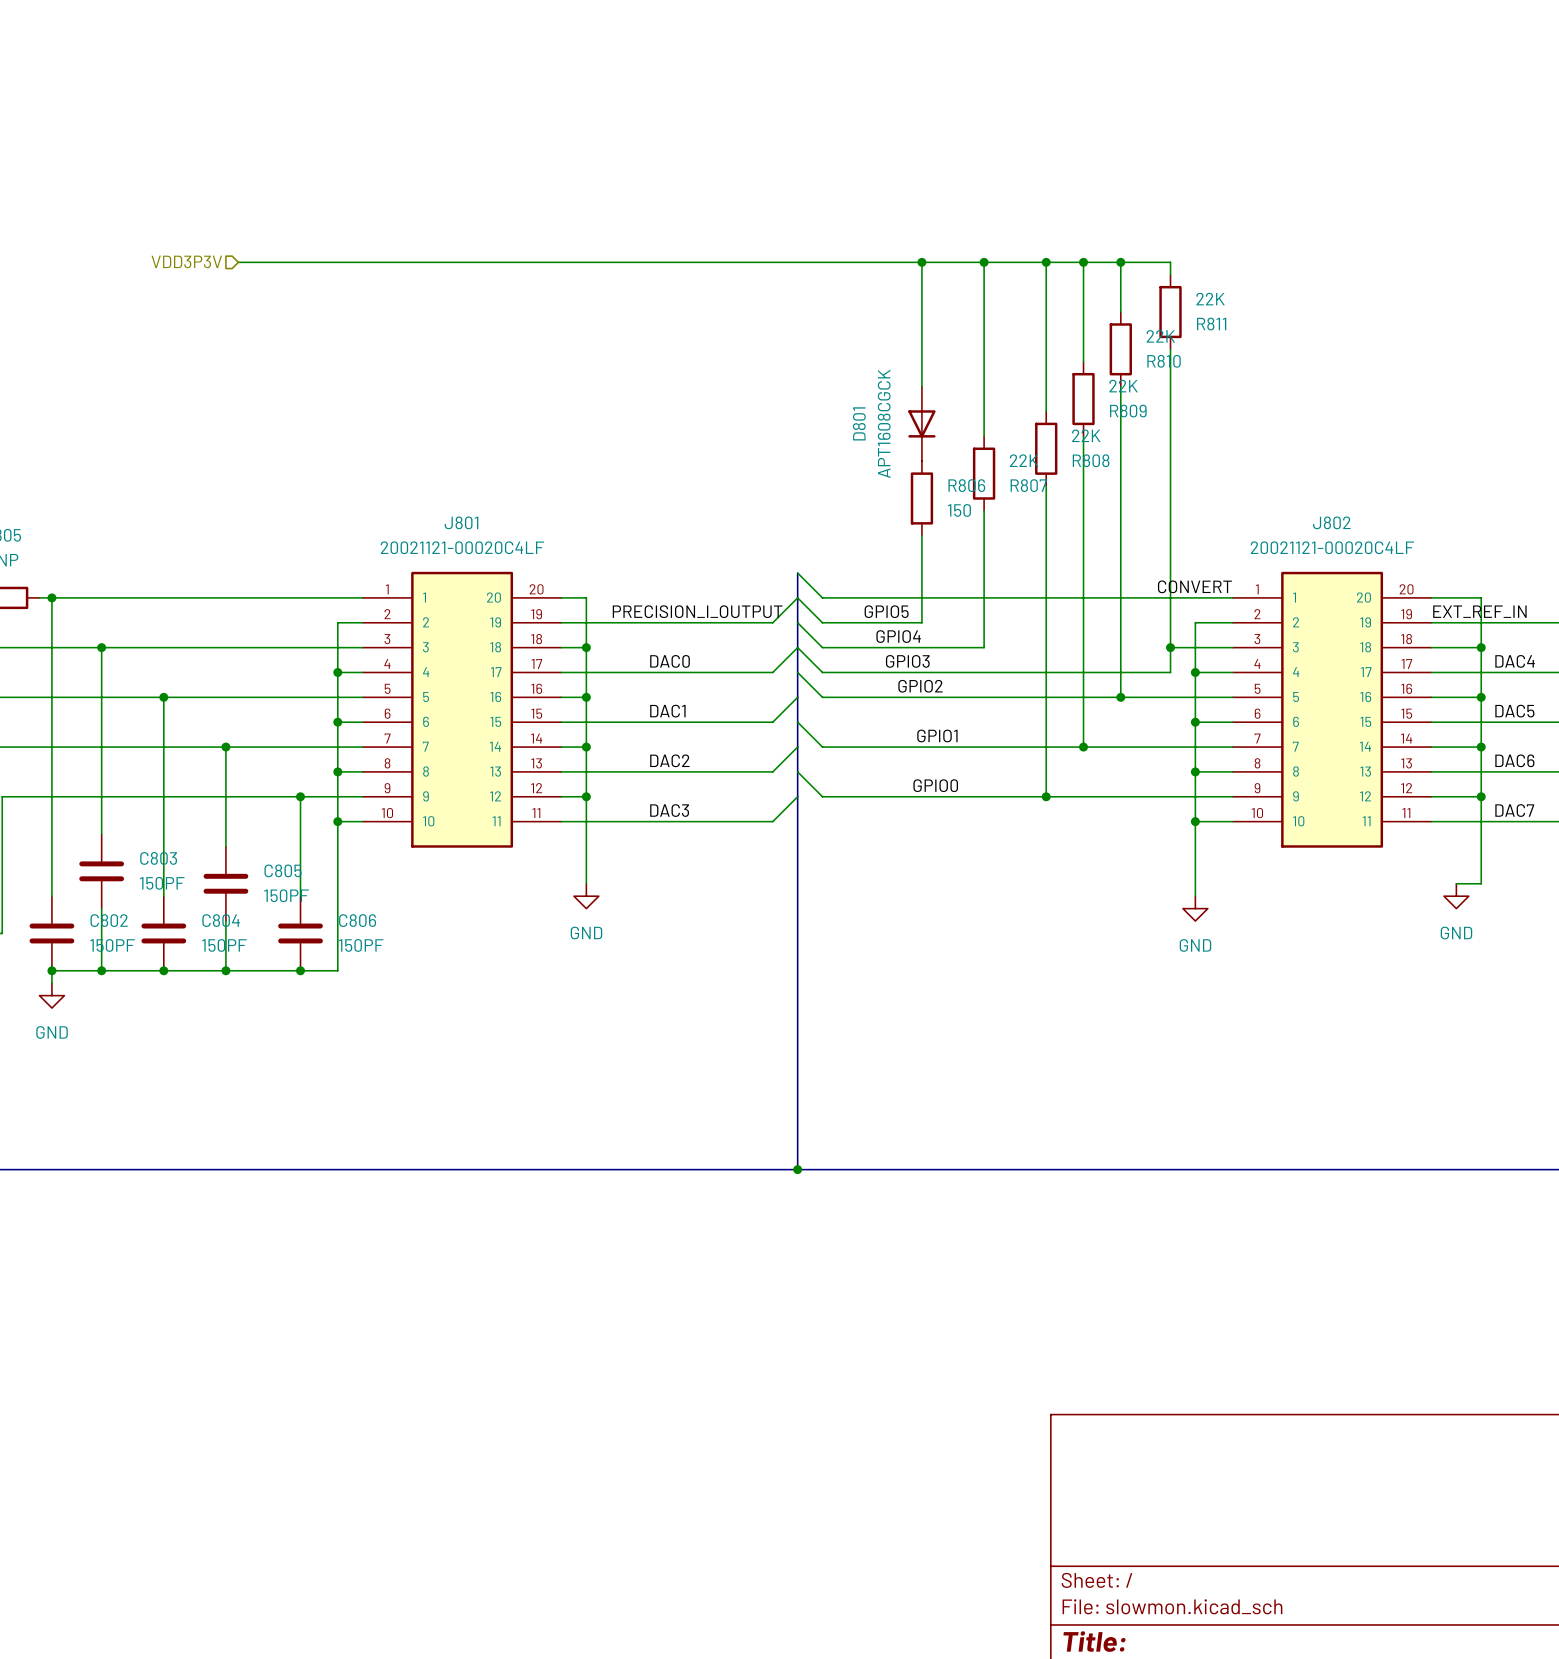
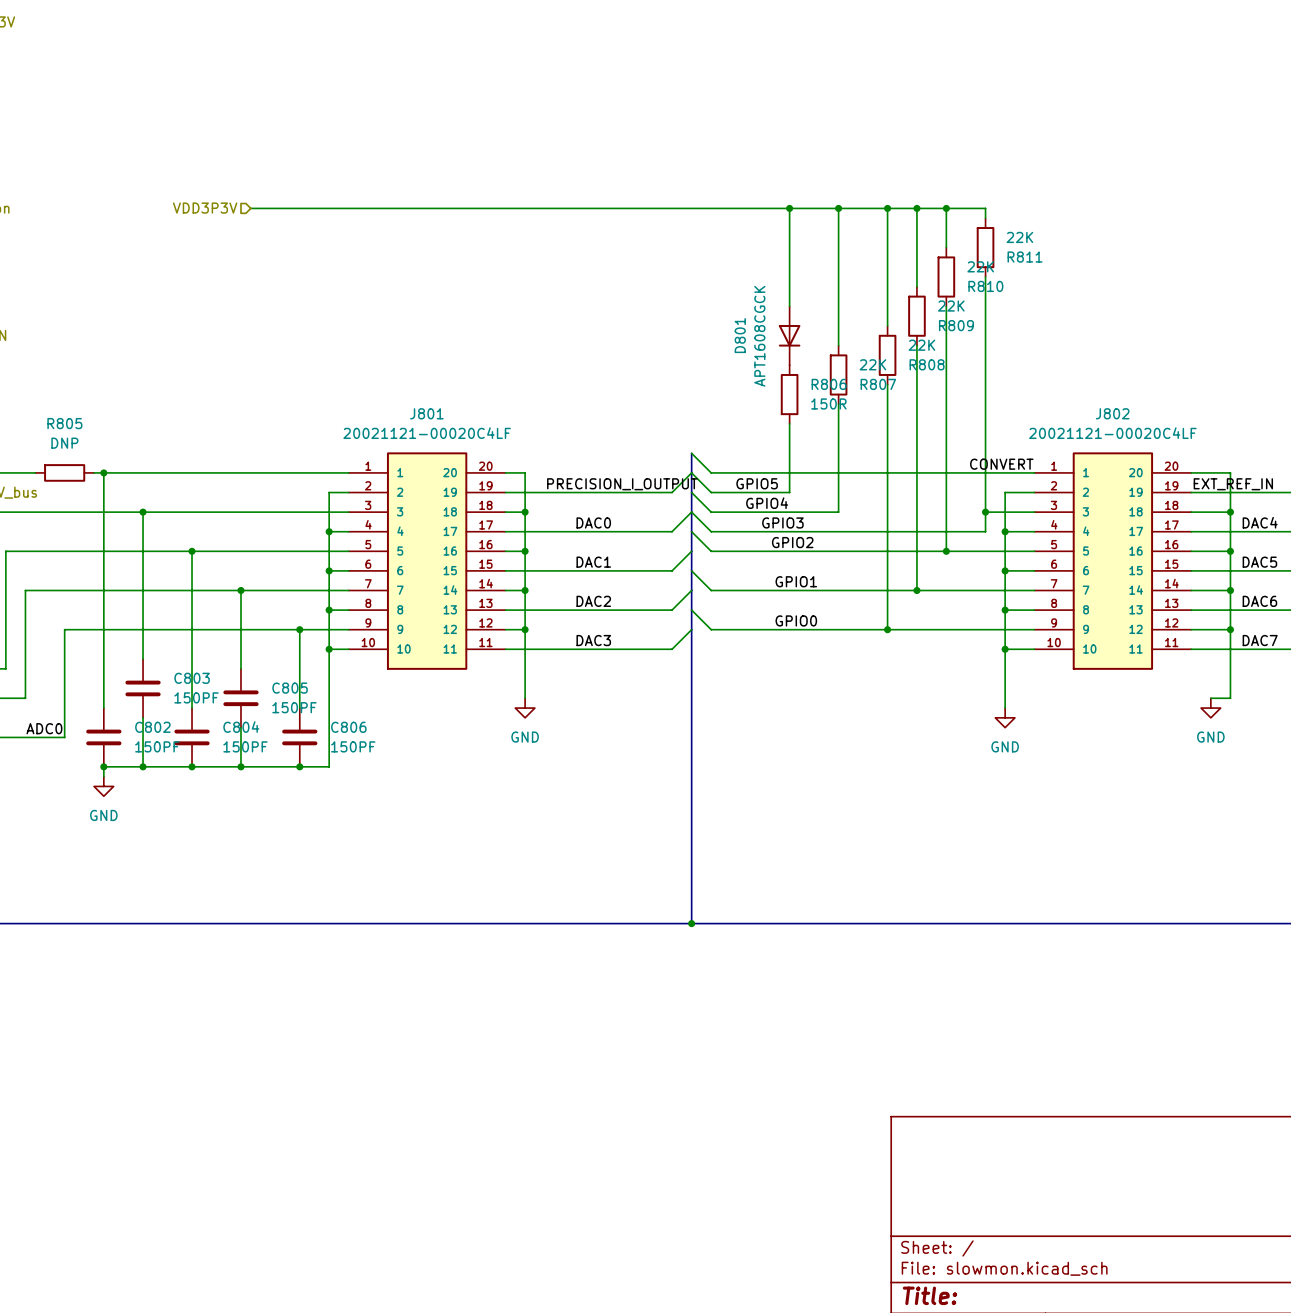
R806 value: 150 (959, 510) -> 150R (828, 403)

